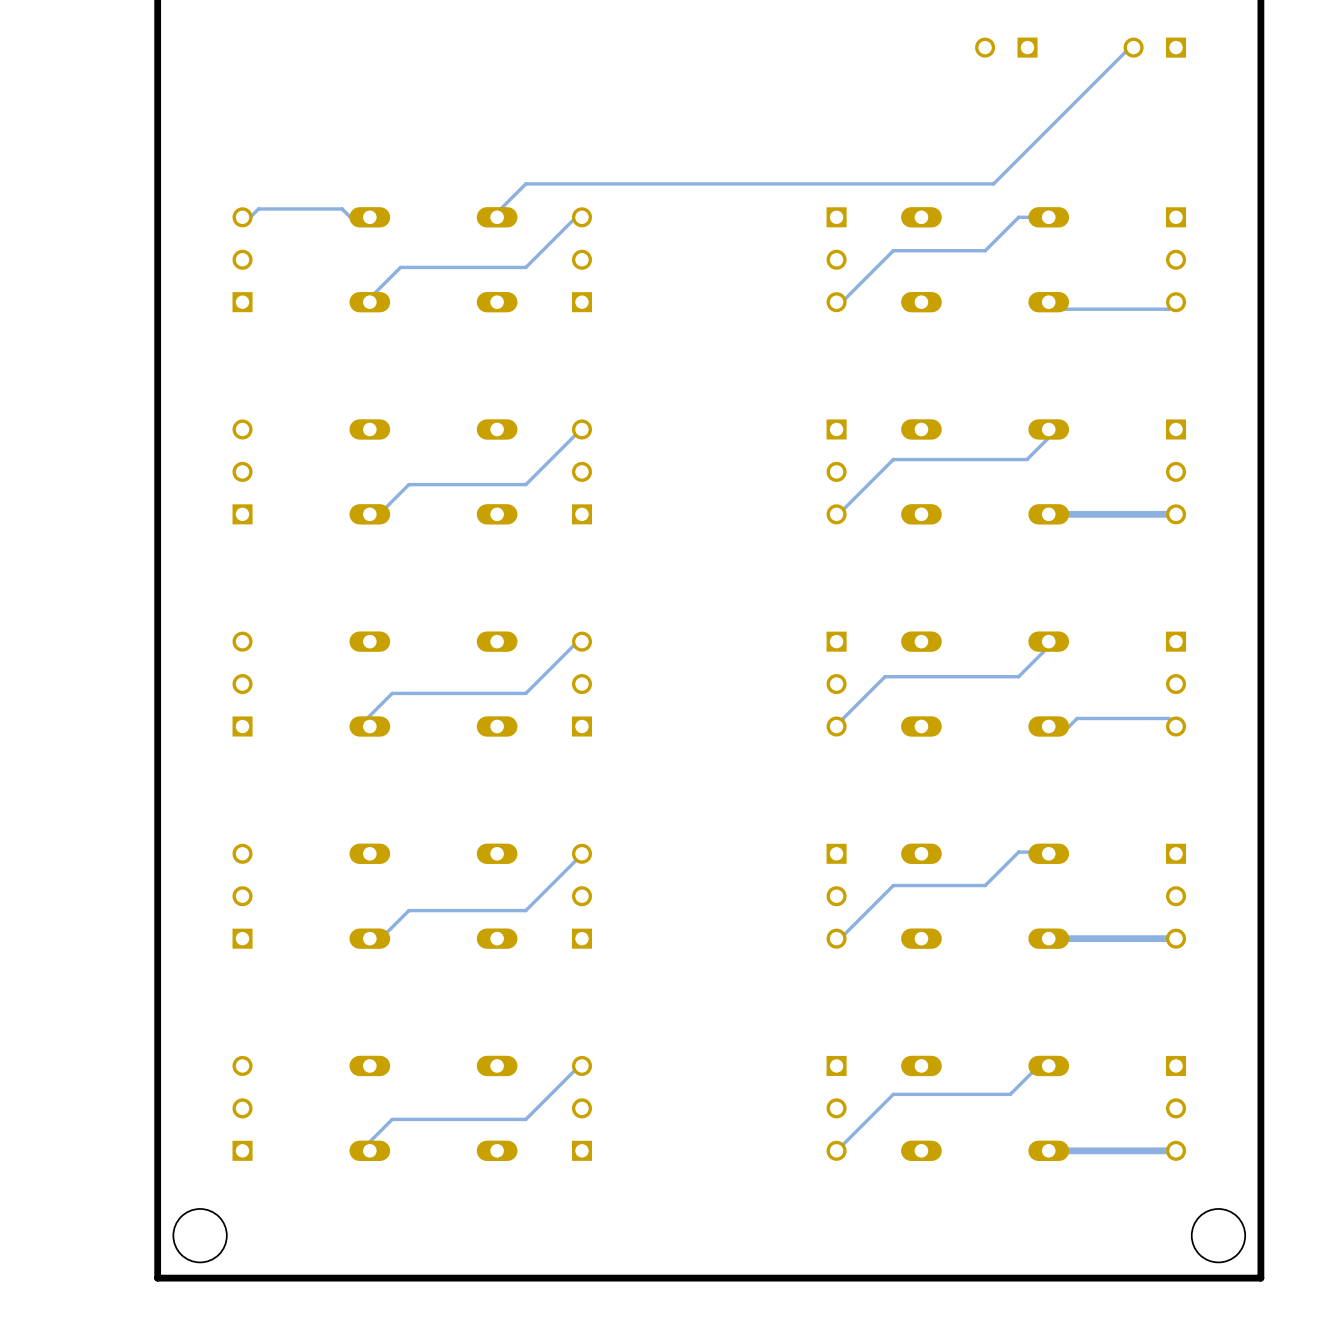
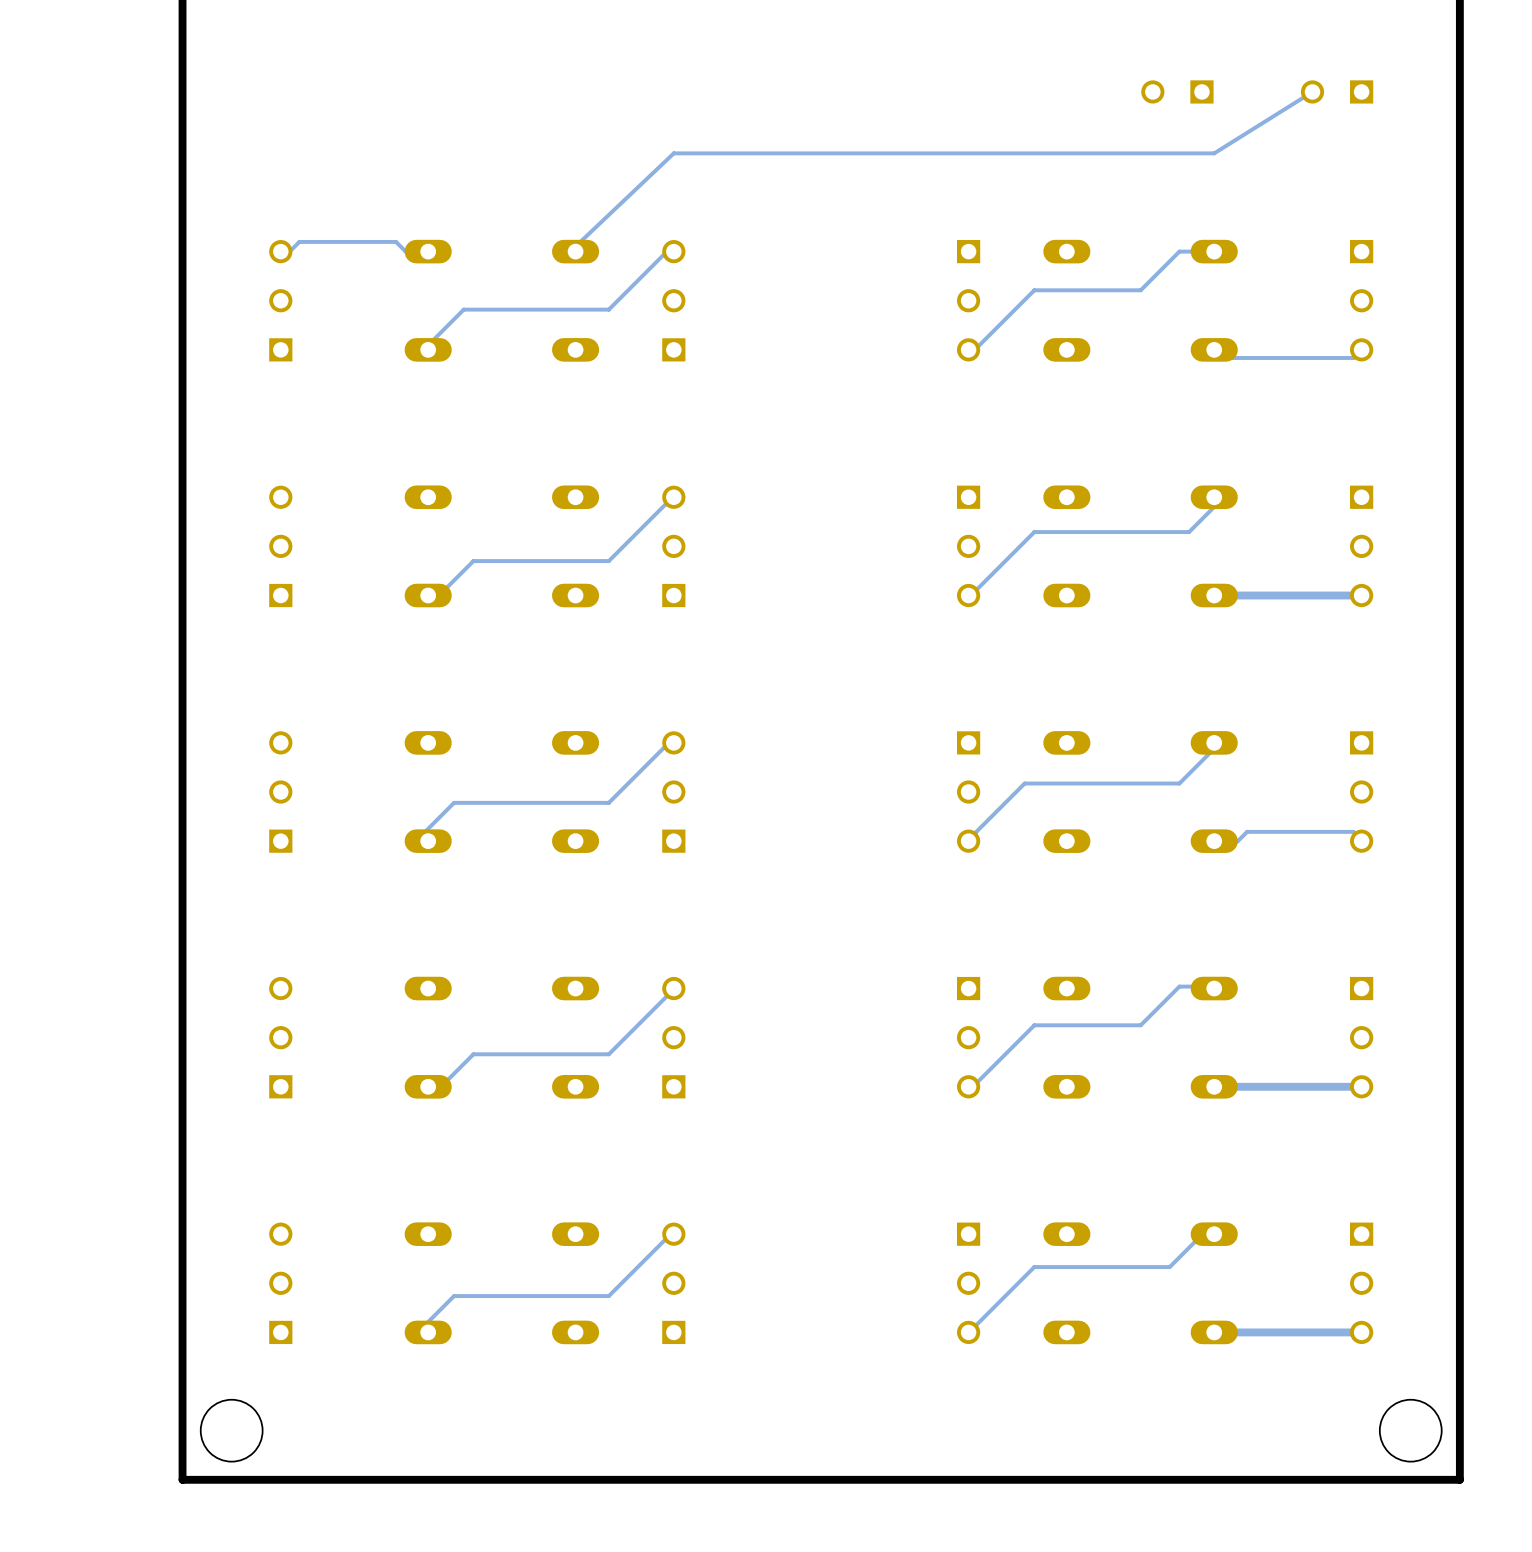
part position: (1006, 47) -> (1177, 91)
track: (1133, 47) (1127, 50) (993, 183) (525, 183) (492, 217) -> (1312, 91) (1214, 153) (673, 153) (570, 251)
part position: (1154, 47) -> (1337, 91)

